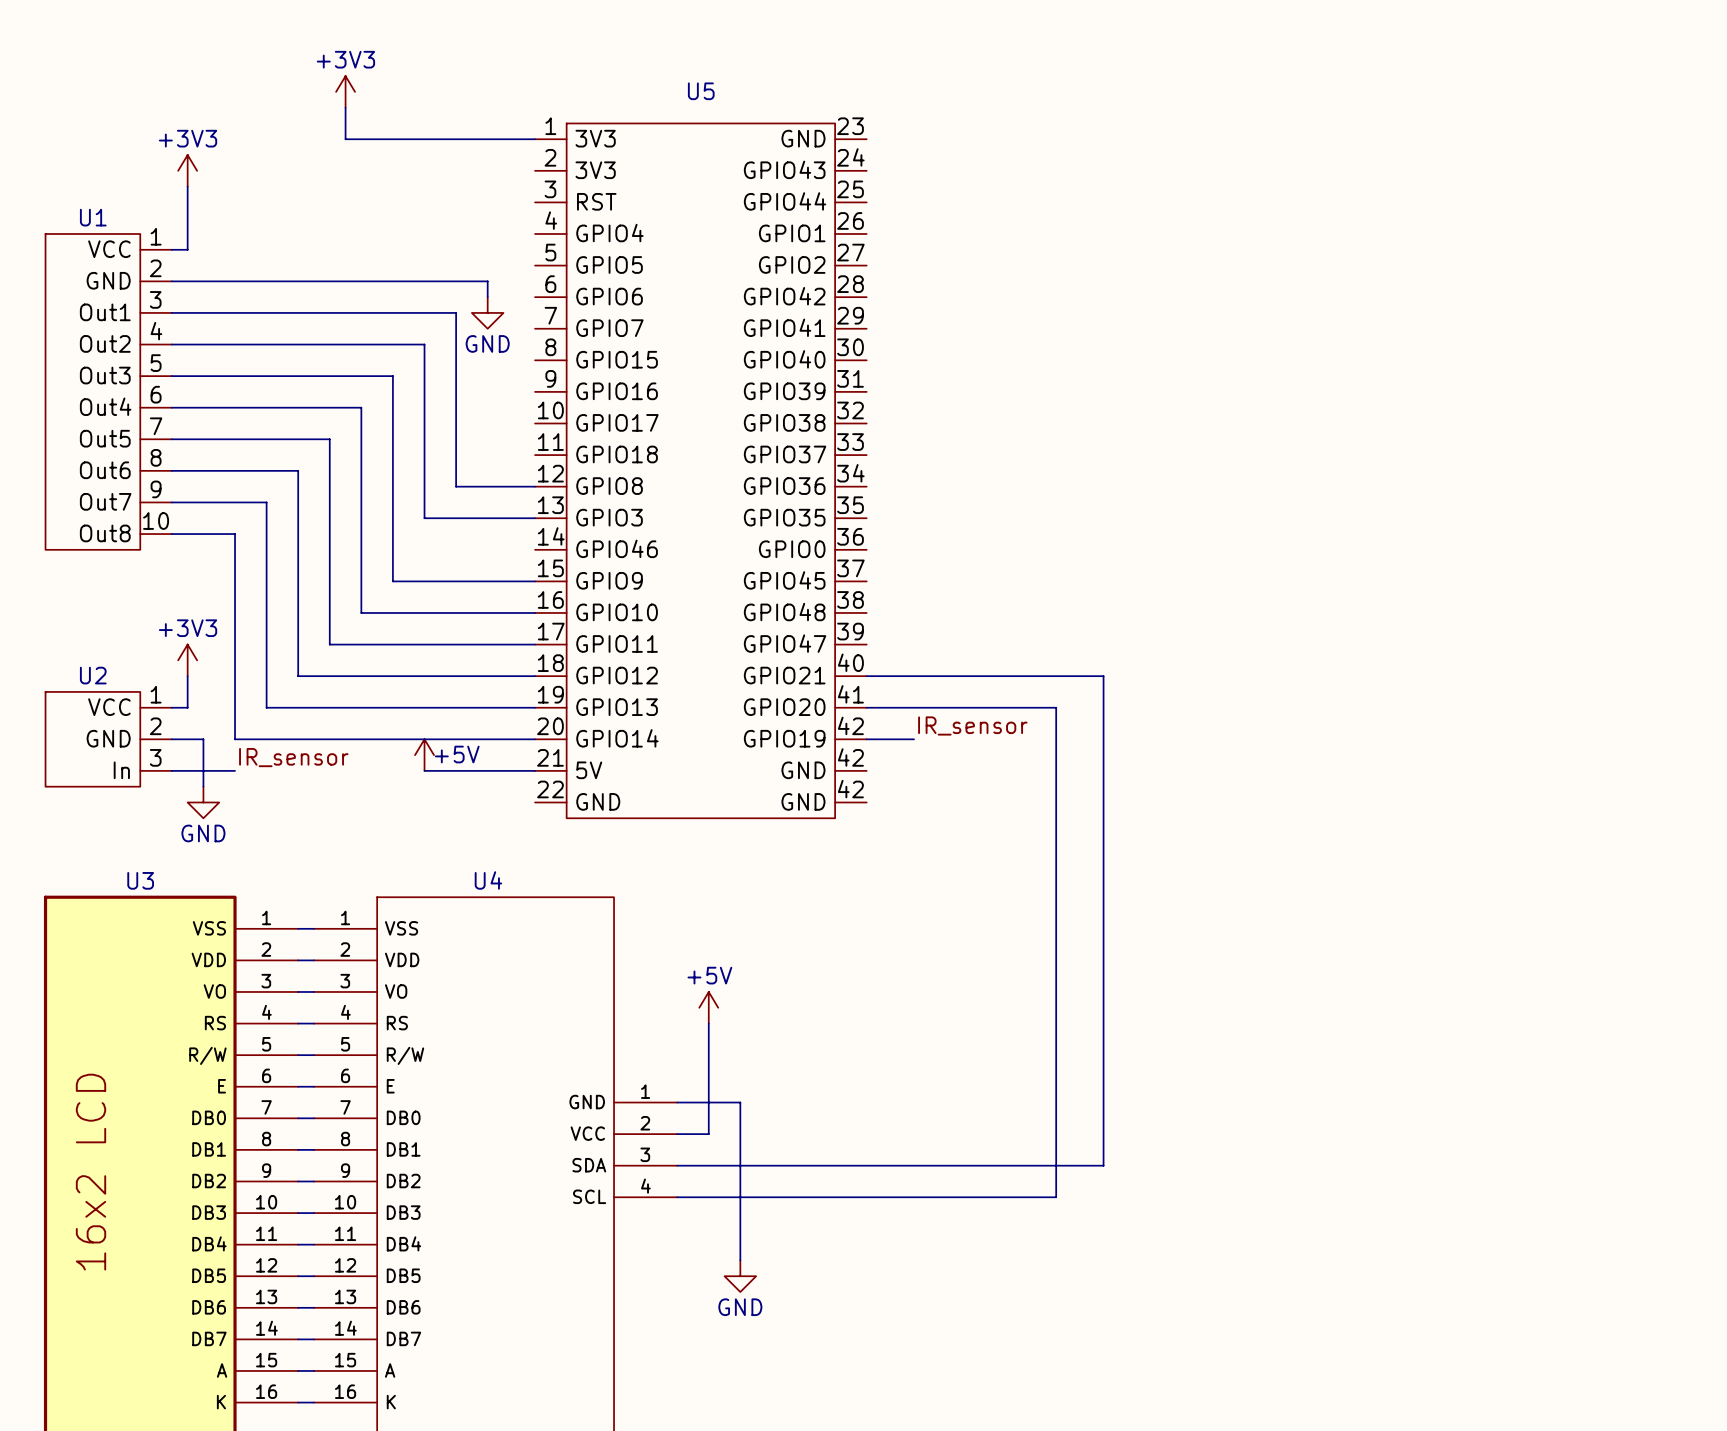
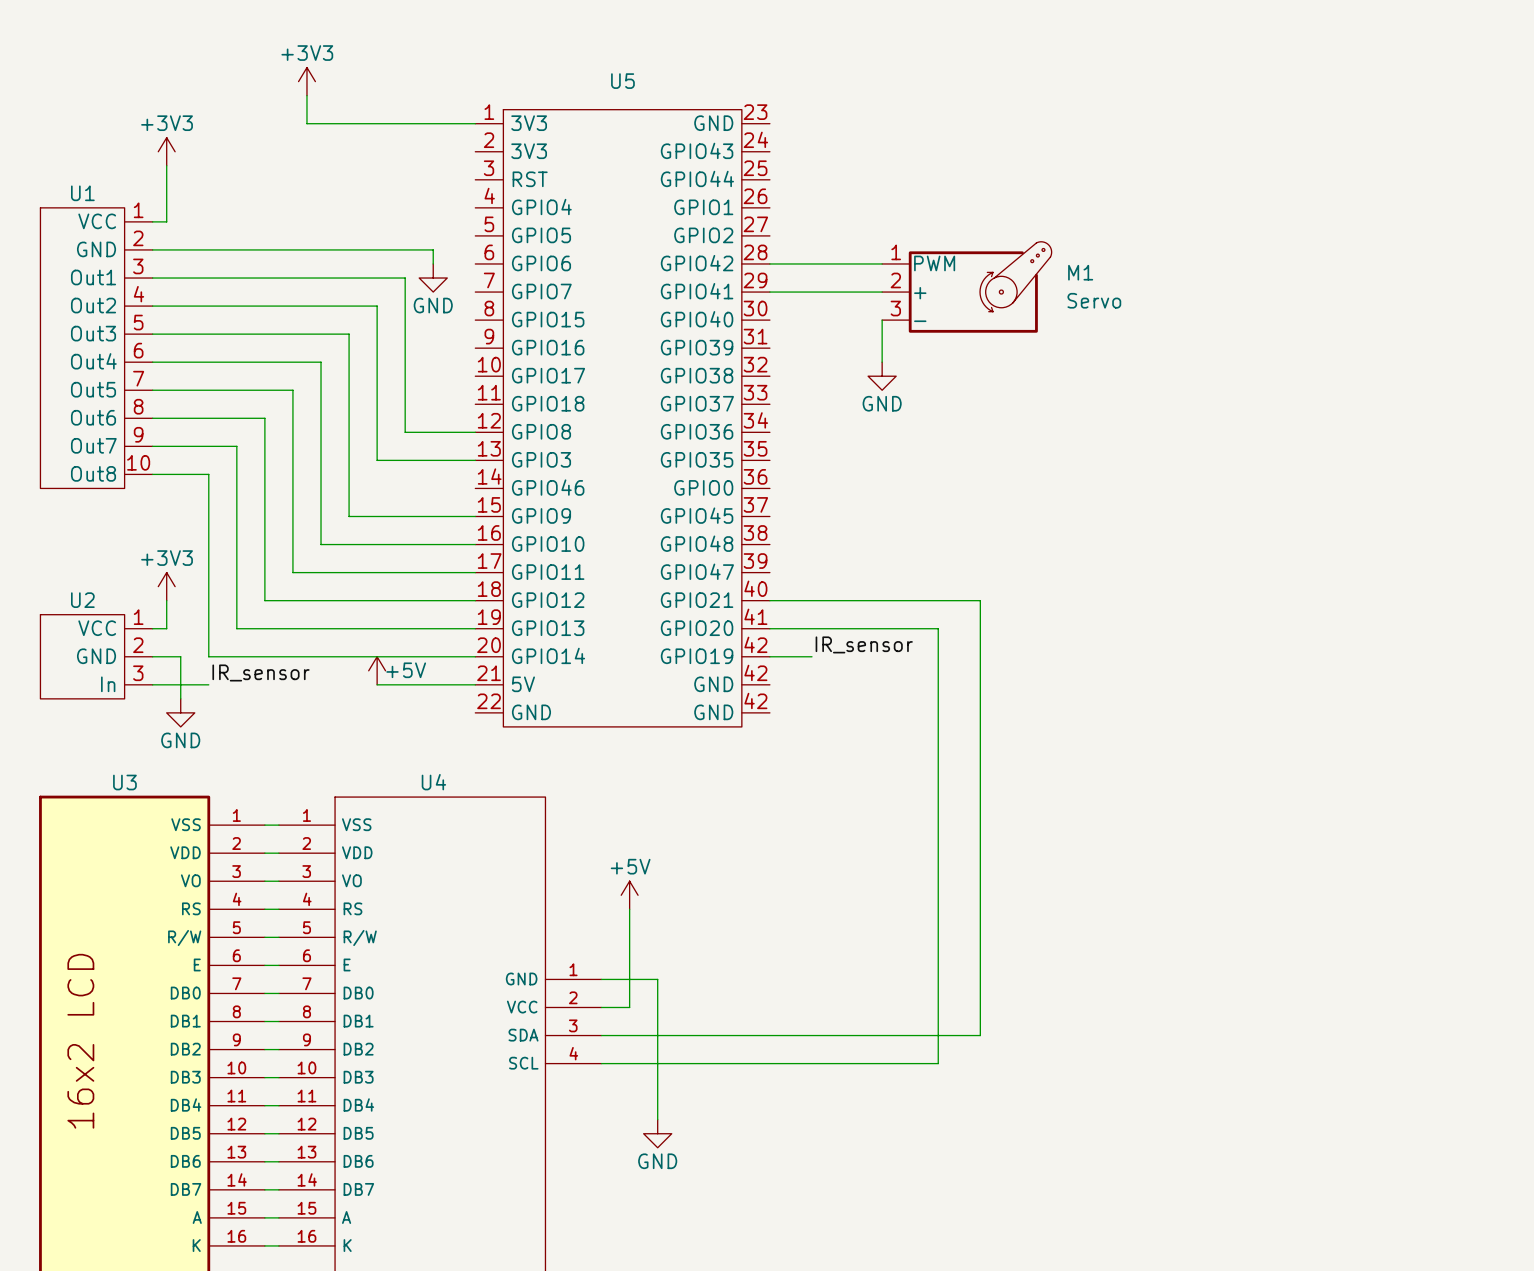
wire: none -> (769, 263) (882, 263)
M1: none -> Servo (966, 287)
wire: none -> (769, 292) (882, 292)
wire: none -> (882, 320) (882, 362)
power symbol: none -> GND (882, 376)

